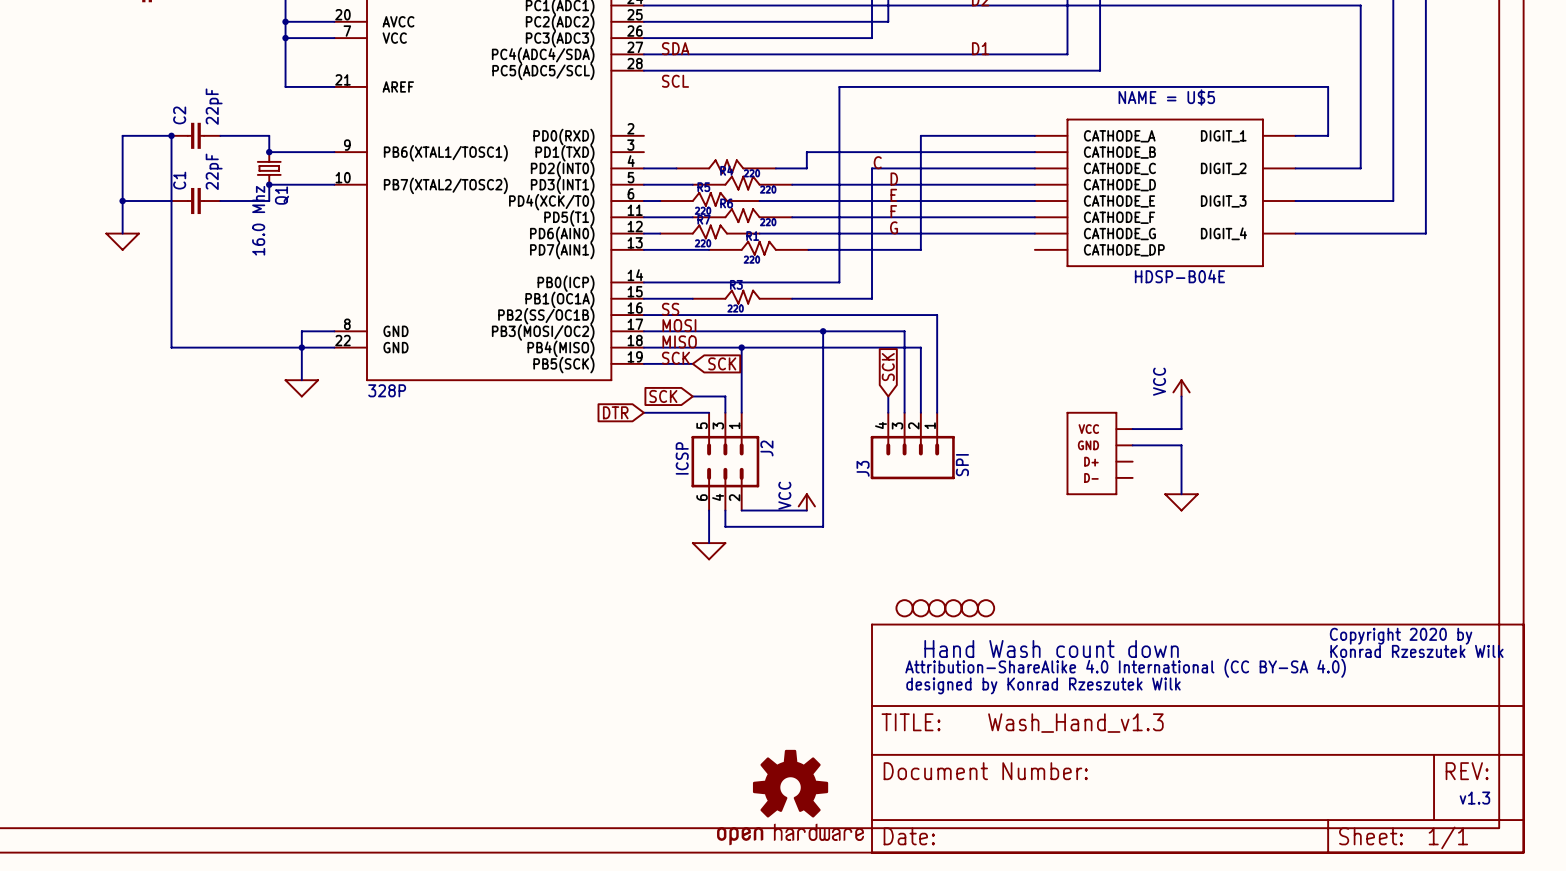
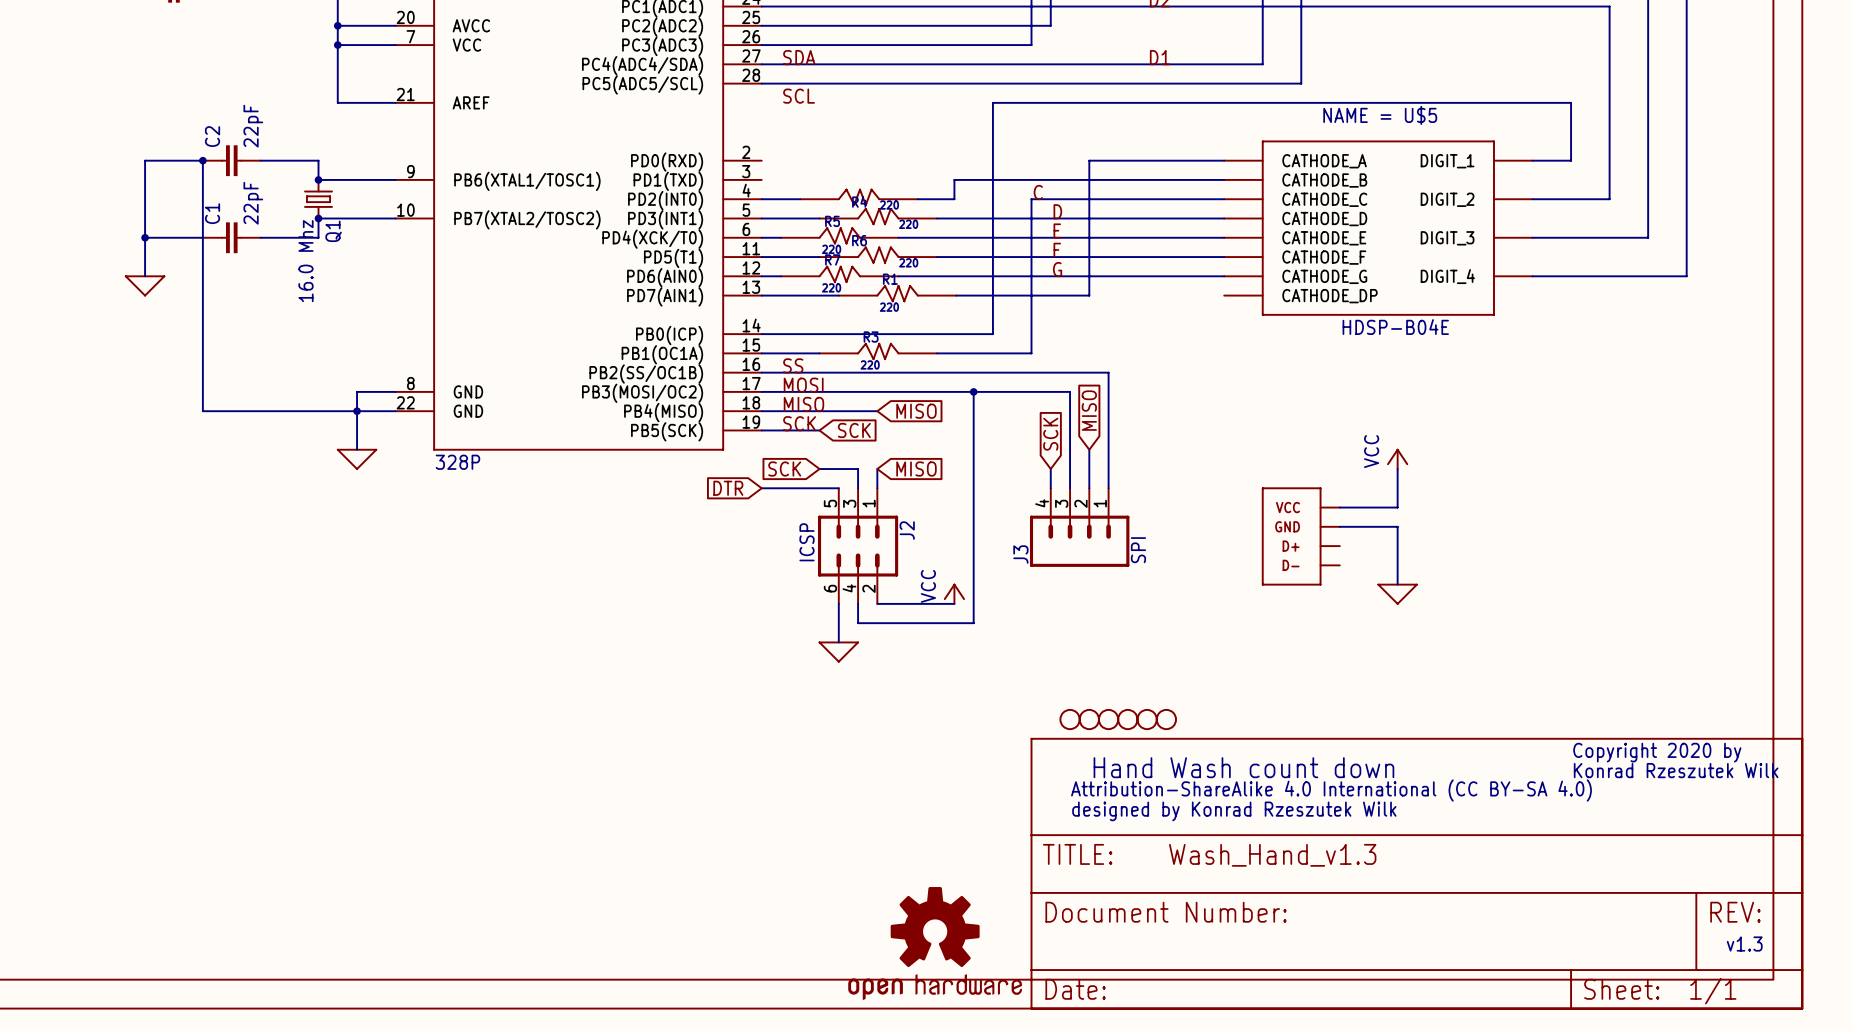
junction: (741, 347) -> none
global label: none -> MISO (916, 411)
global label: none -> MISO (1089, 410)
wire: (920, 380) (920, 347) (741, 347) (741, 396) -> none
global label: none -> MISO (916, 469)

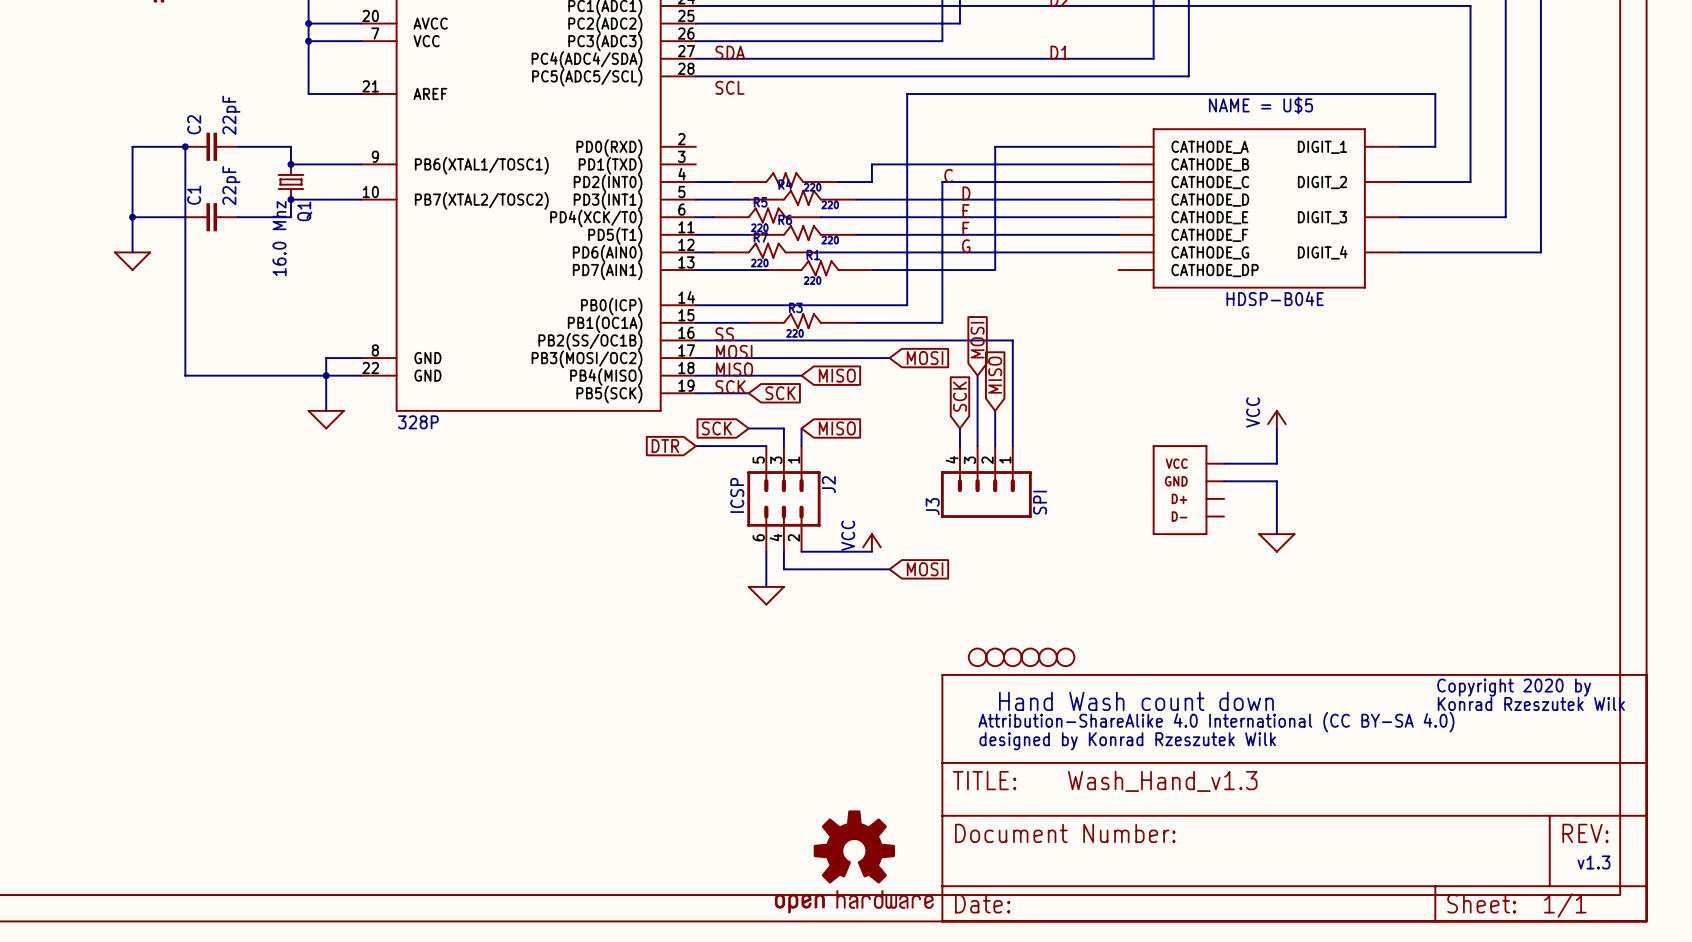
global label: none -> MOSI (977, 340)
junction: (973, 391) -> none
global label: none -> MOSI (925, 358)
wire: (1070, 411) (1070, 391) (973, 391) (973, 623) -> none
global label: none -> MOSI (925, 569)

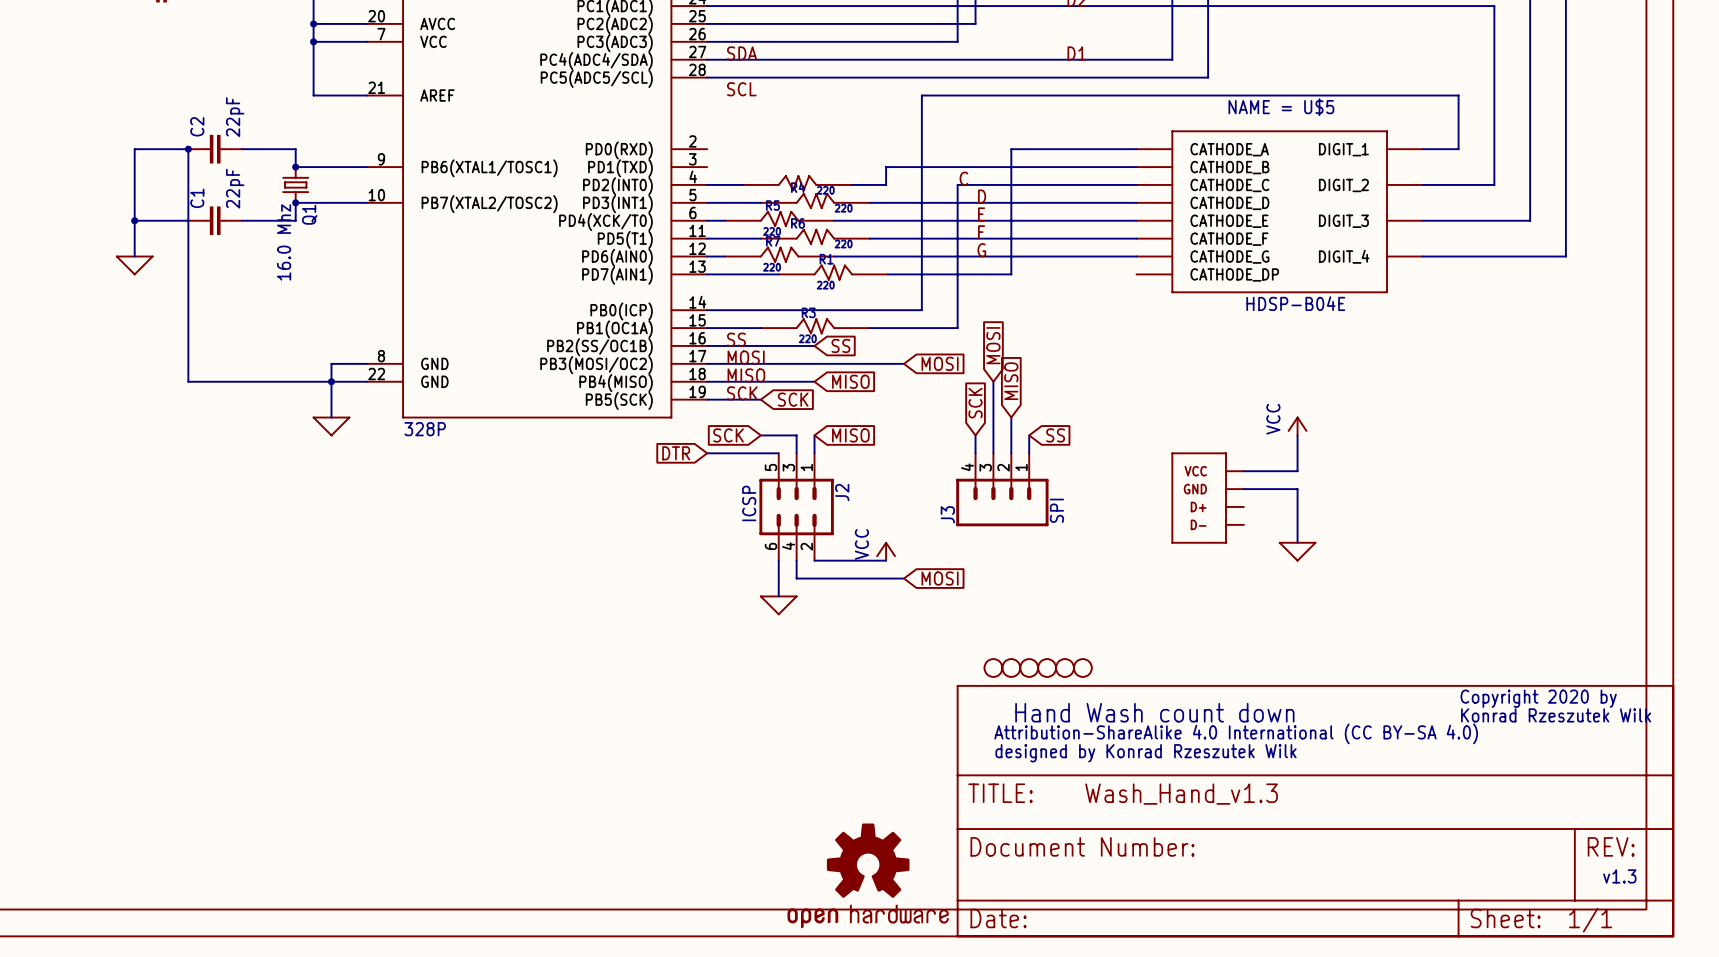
wire: (801, 340) (1012, 340) (1012, 428) -> none
global label: none -> SS (840, 345)
global label: none -> SS (1055, 435)

